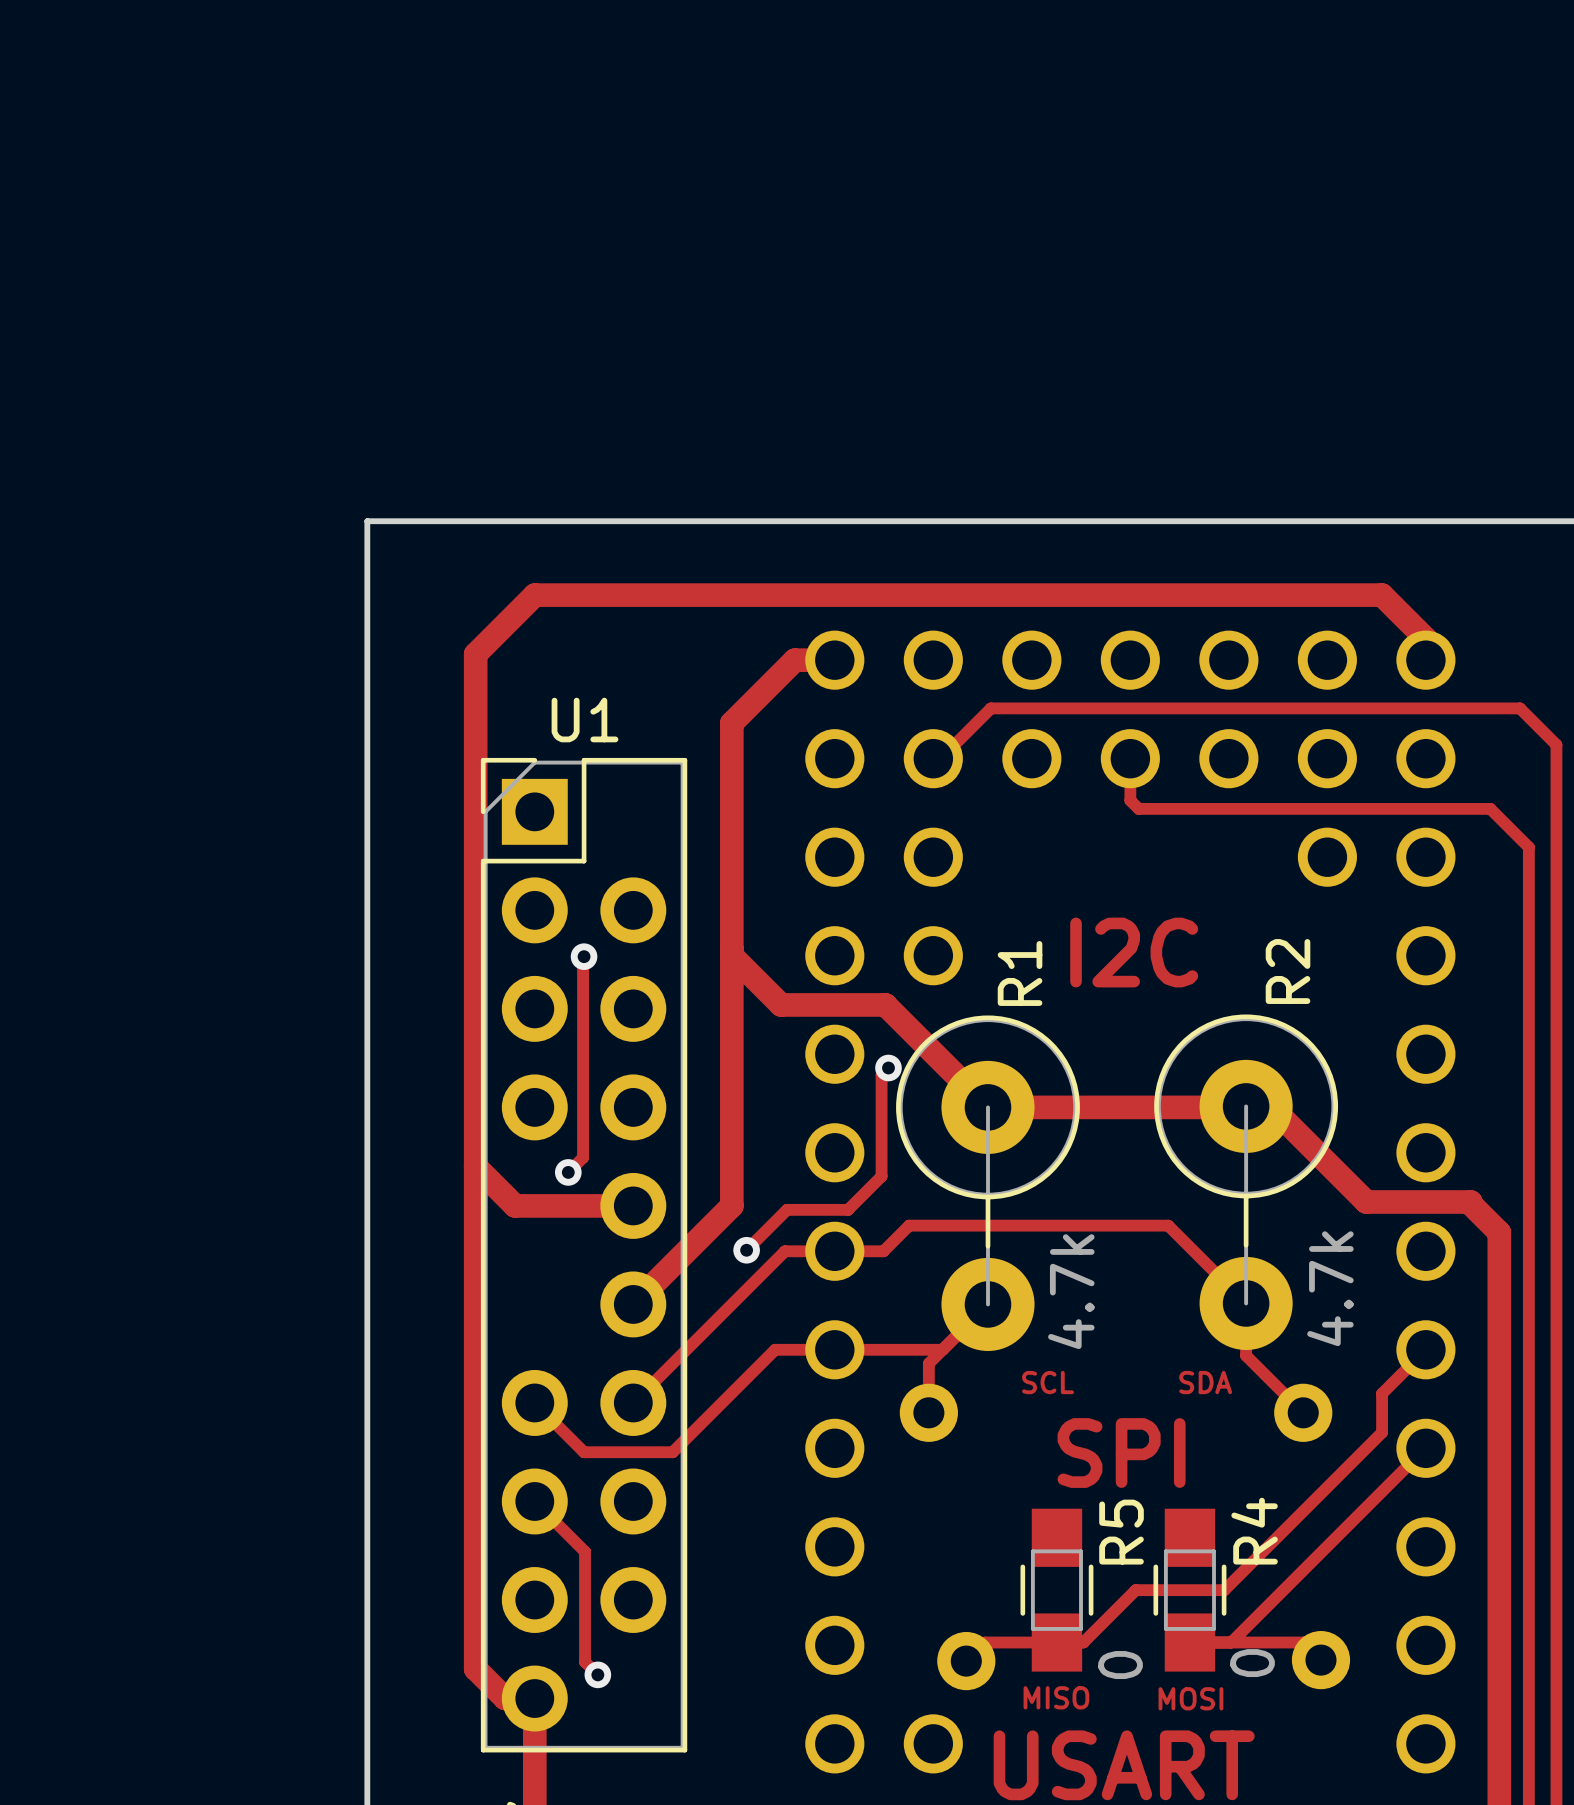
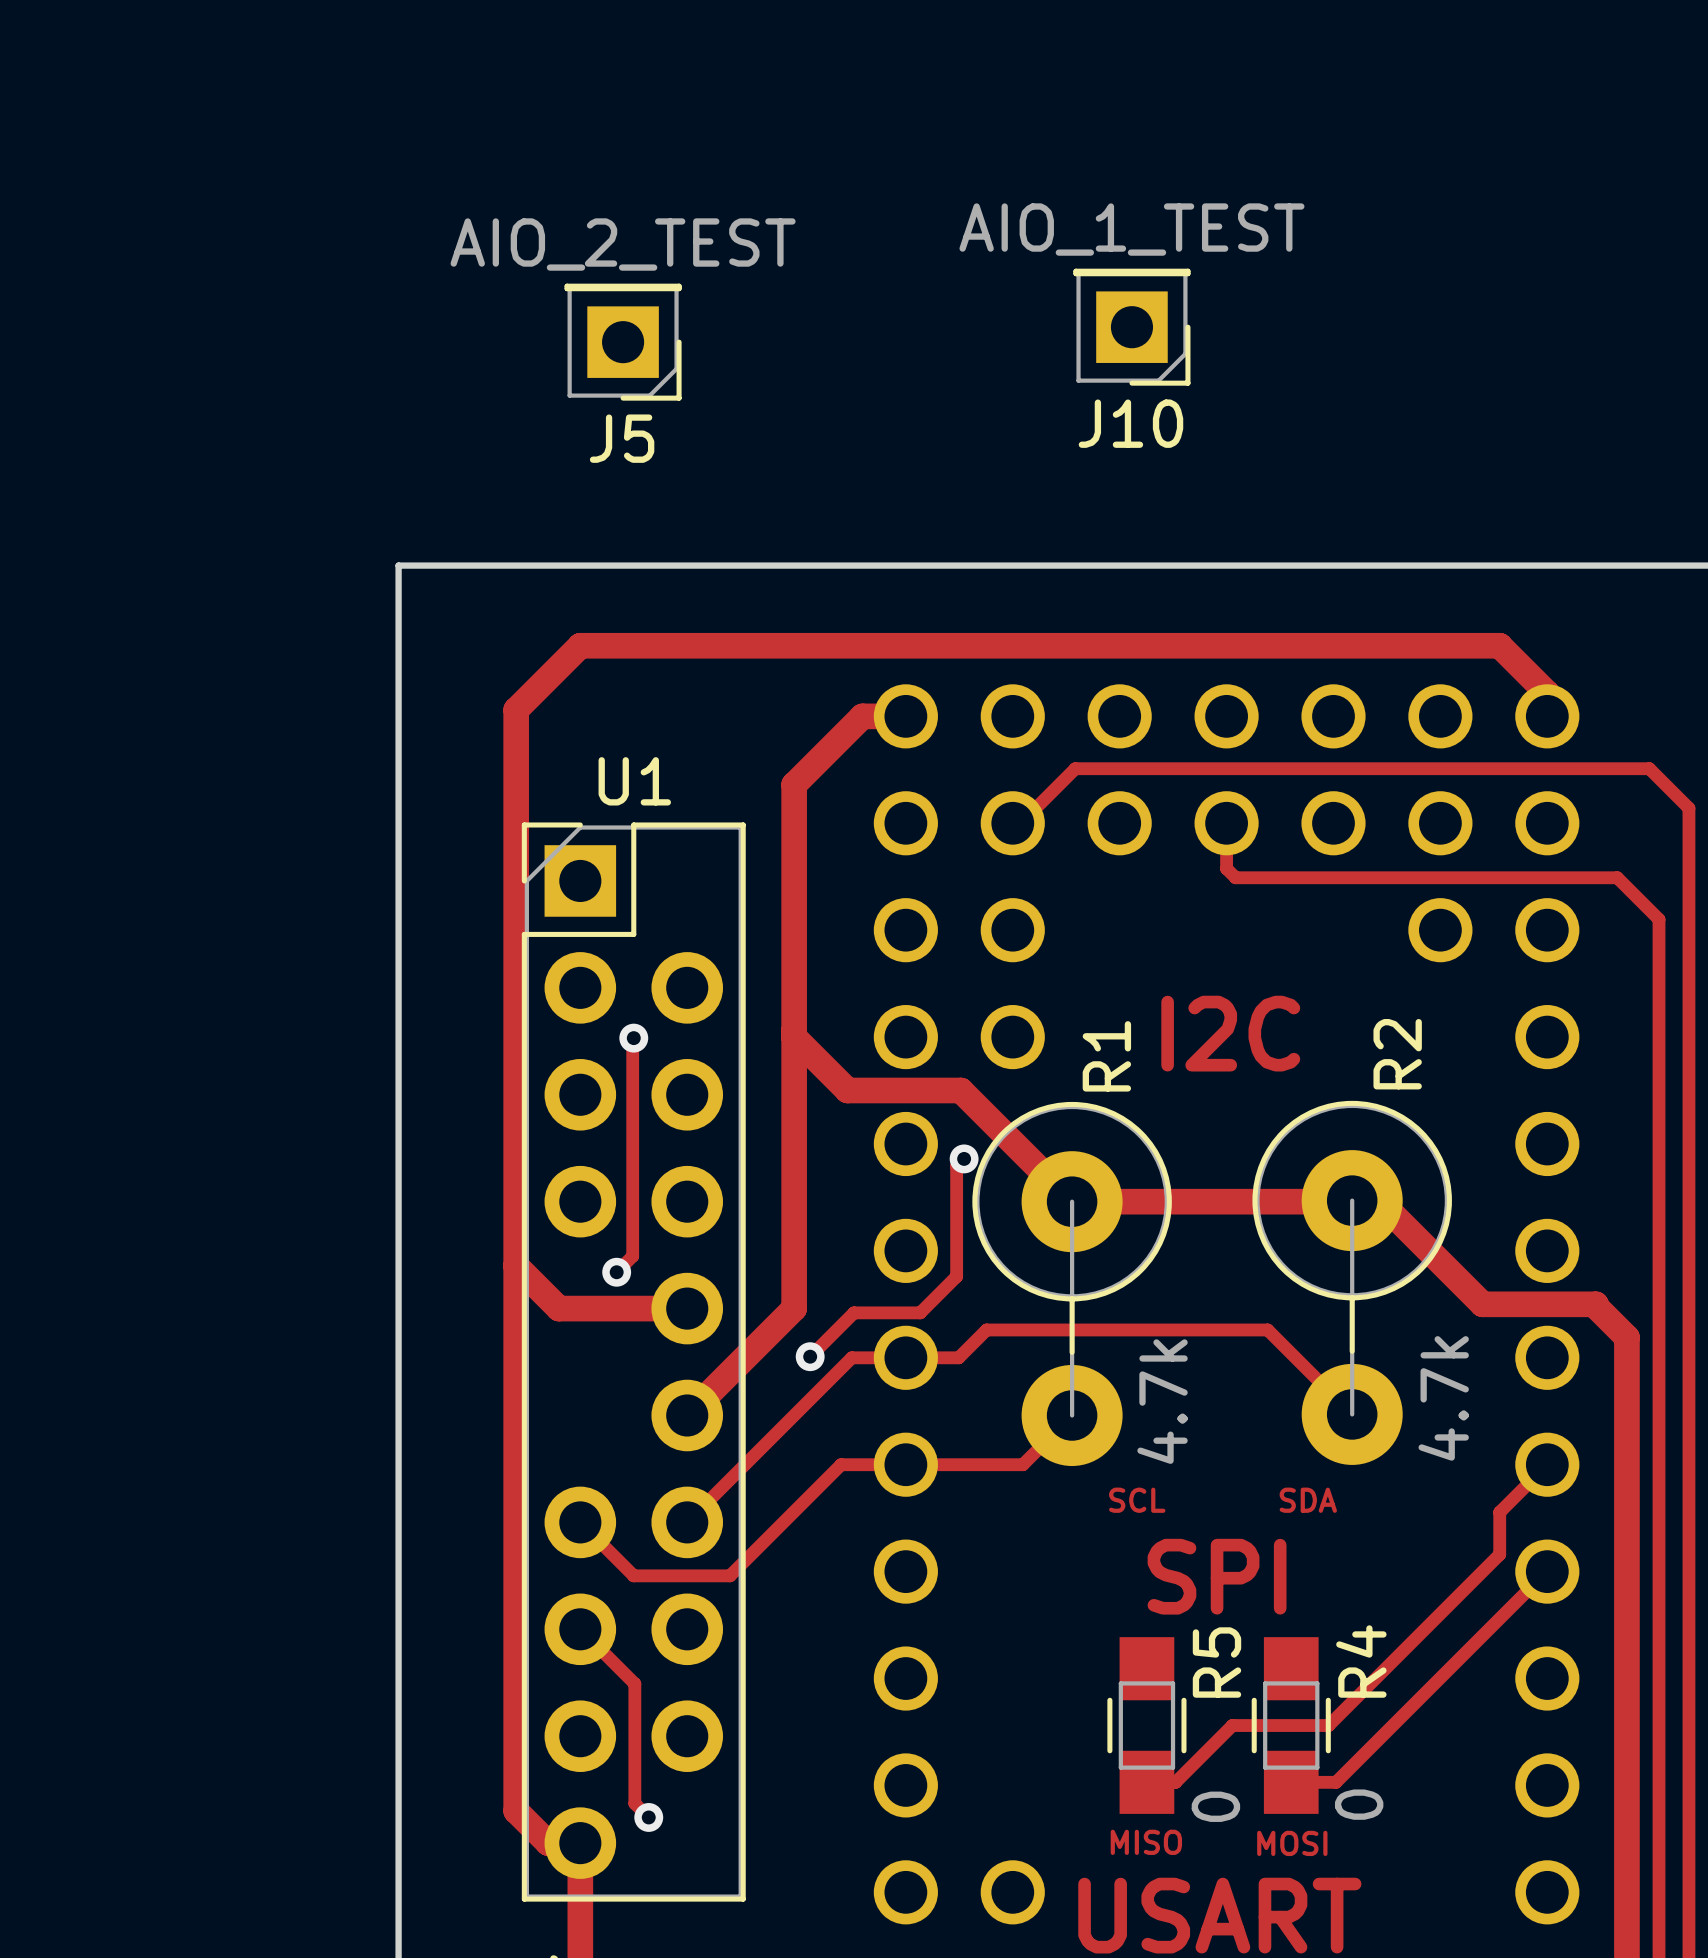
J10: none -> AIO_1_TEST (1131, 327)
J5: none -> AIO_2_TEST (623, 342)
track: (1246, 1303) (1246, 1355) (1303, 1412) -> none
track: (942, 1349) (928, 1363) (928, 1412) -> none
part: (928, 1412) -> none
part: (1303, 1412) -> none
track: (1056, 1642) (984, 1642) (966, 1661) -> none
track: (1231, 1642) (1303, 1642) (1320, 1660) -> none
part: (1320, 1660) -> none
part: (966, 1661) -> none

